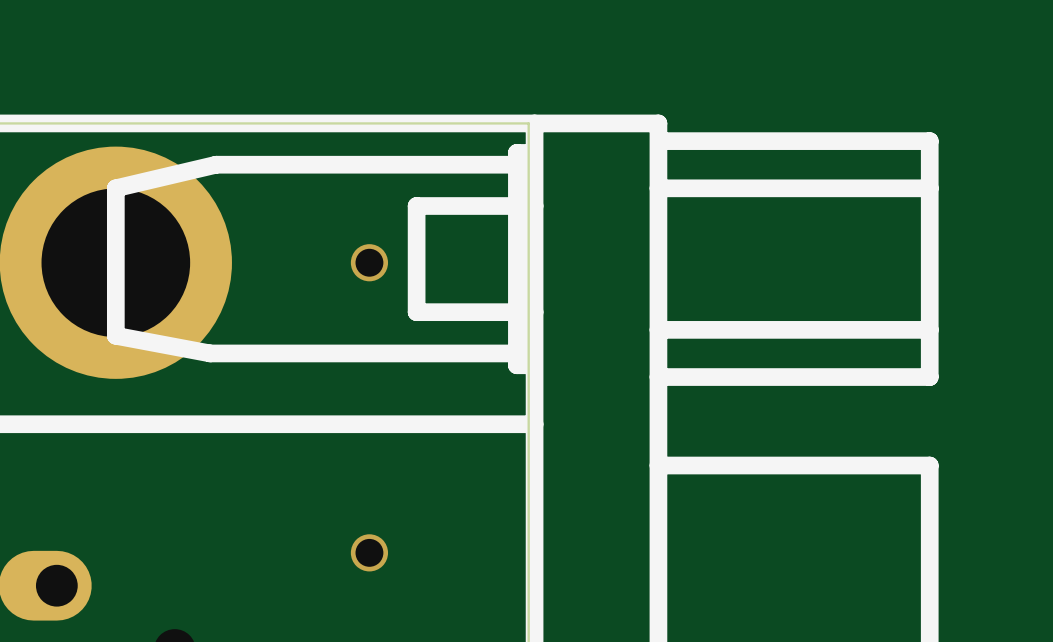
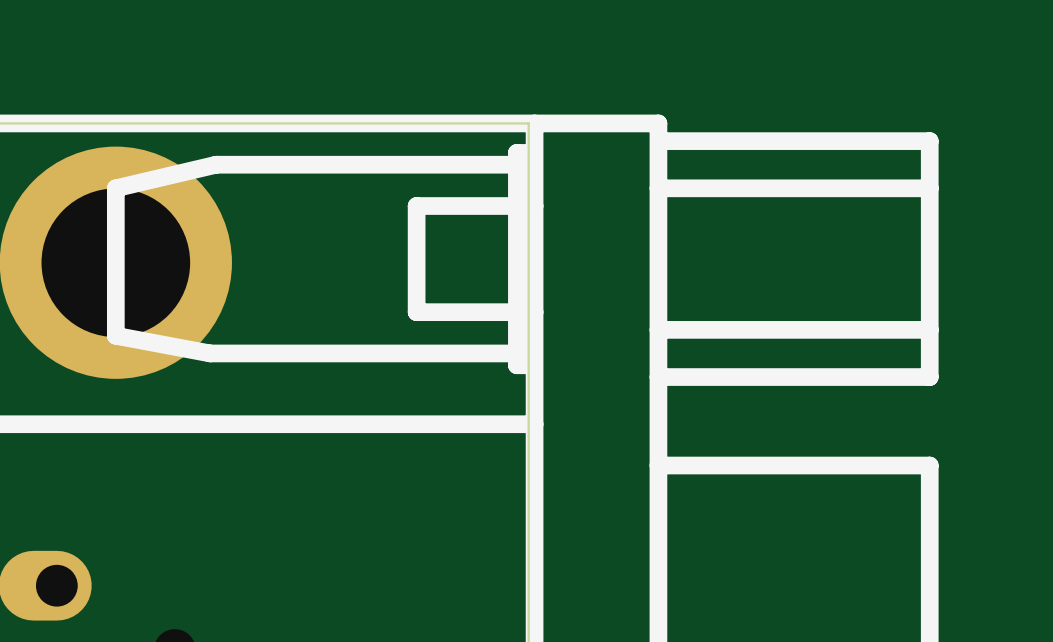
via: (369, 262) -> none
via: (369, 552) -> none

